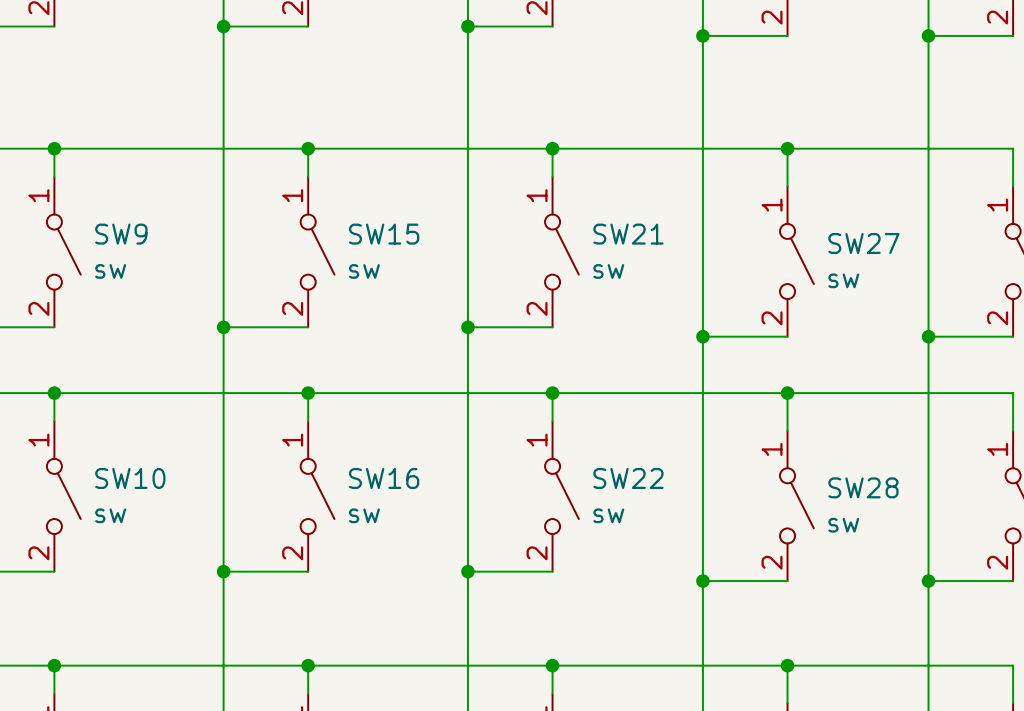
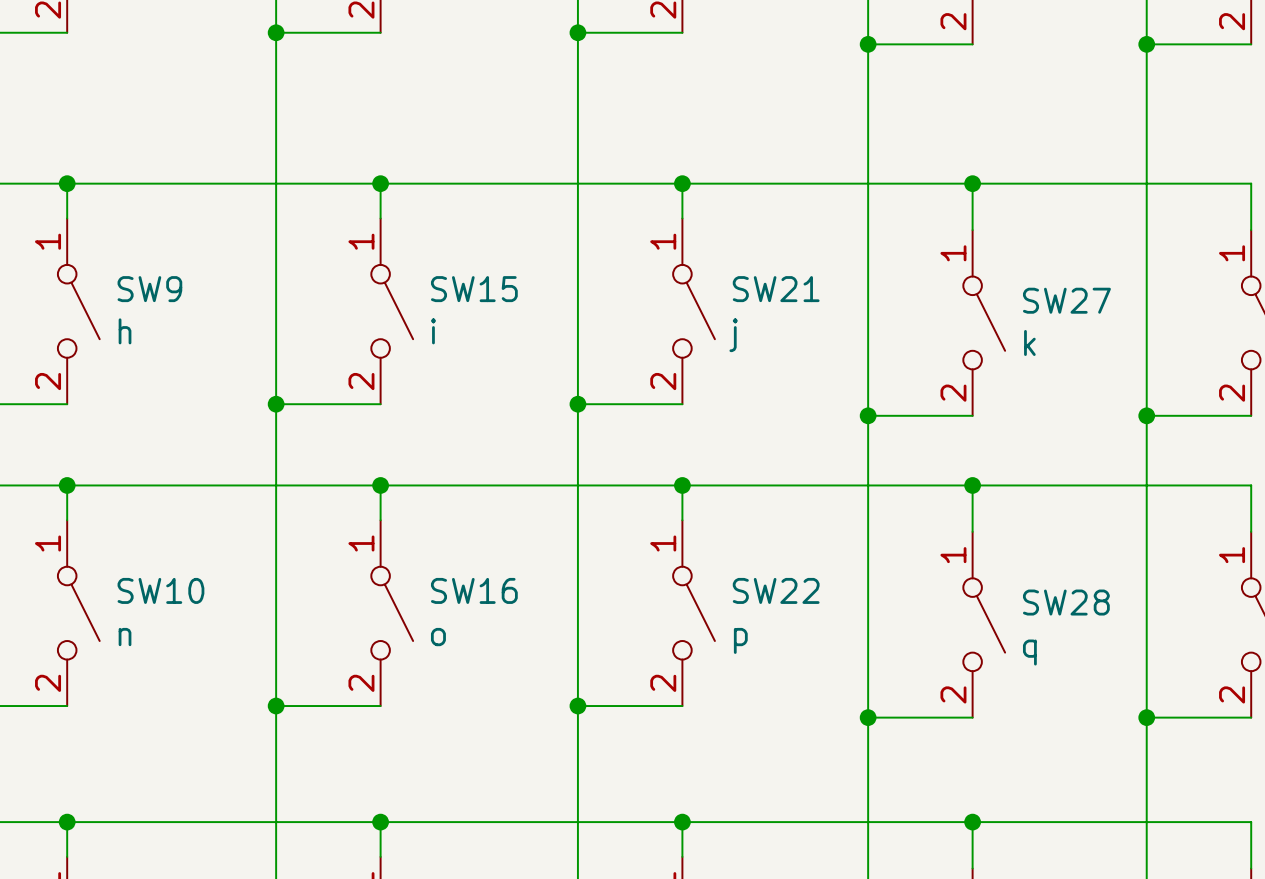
SW9 value: sw (110, 271) -> h (125, 331)
SW15 value: sw (364, 271) -> i (433, 331)
SW21 value: sw (608, 271) -> j (733, 335)
SW27 value: sw (843, 280) -> k (1029, 342)
SW10 value: sw (110, 515) -> n (125, 637)
SW16 value: sw (364, 515) -> o (438, 637)
SW22 value: sw (608, 515) -> p (740, 640)
SW28 value: sw (843, 525) -> q (1029, 652)

